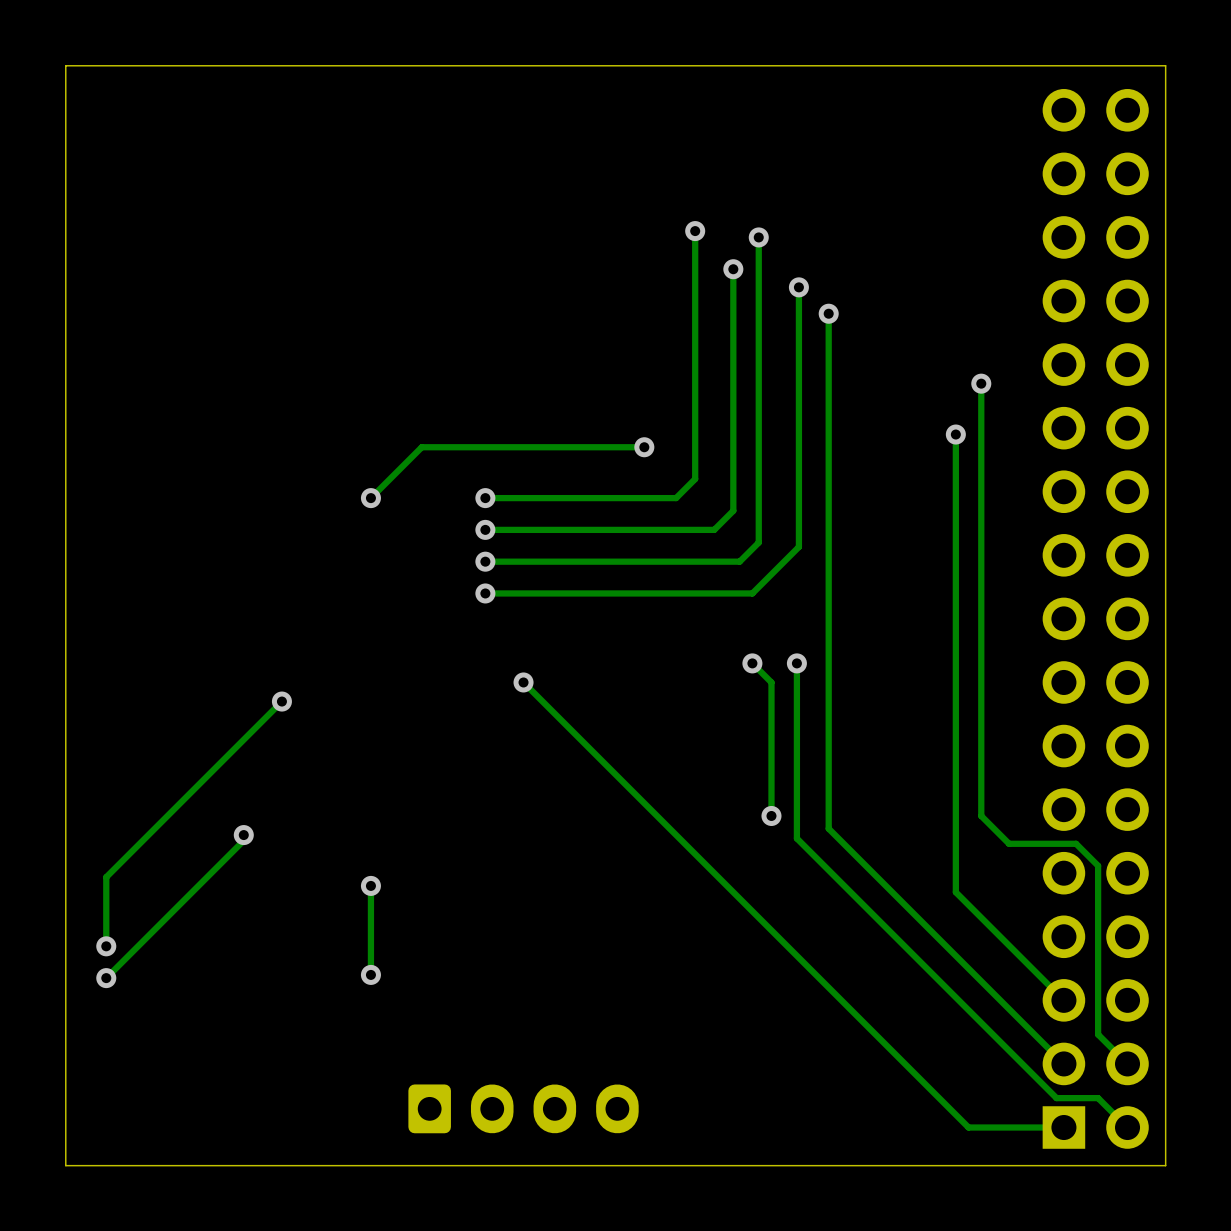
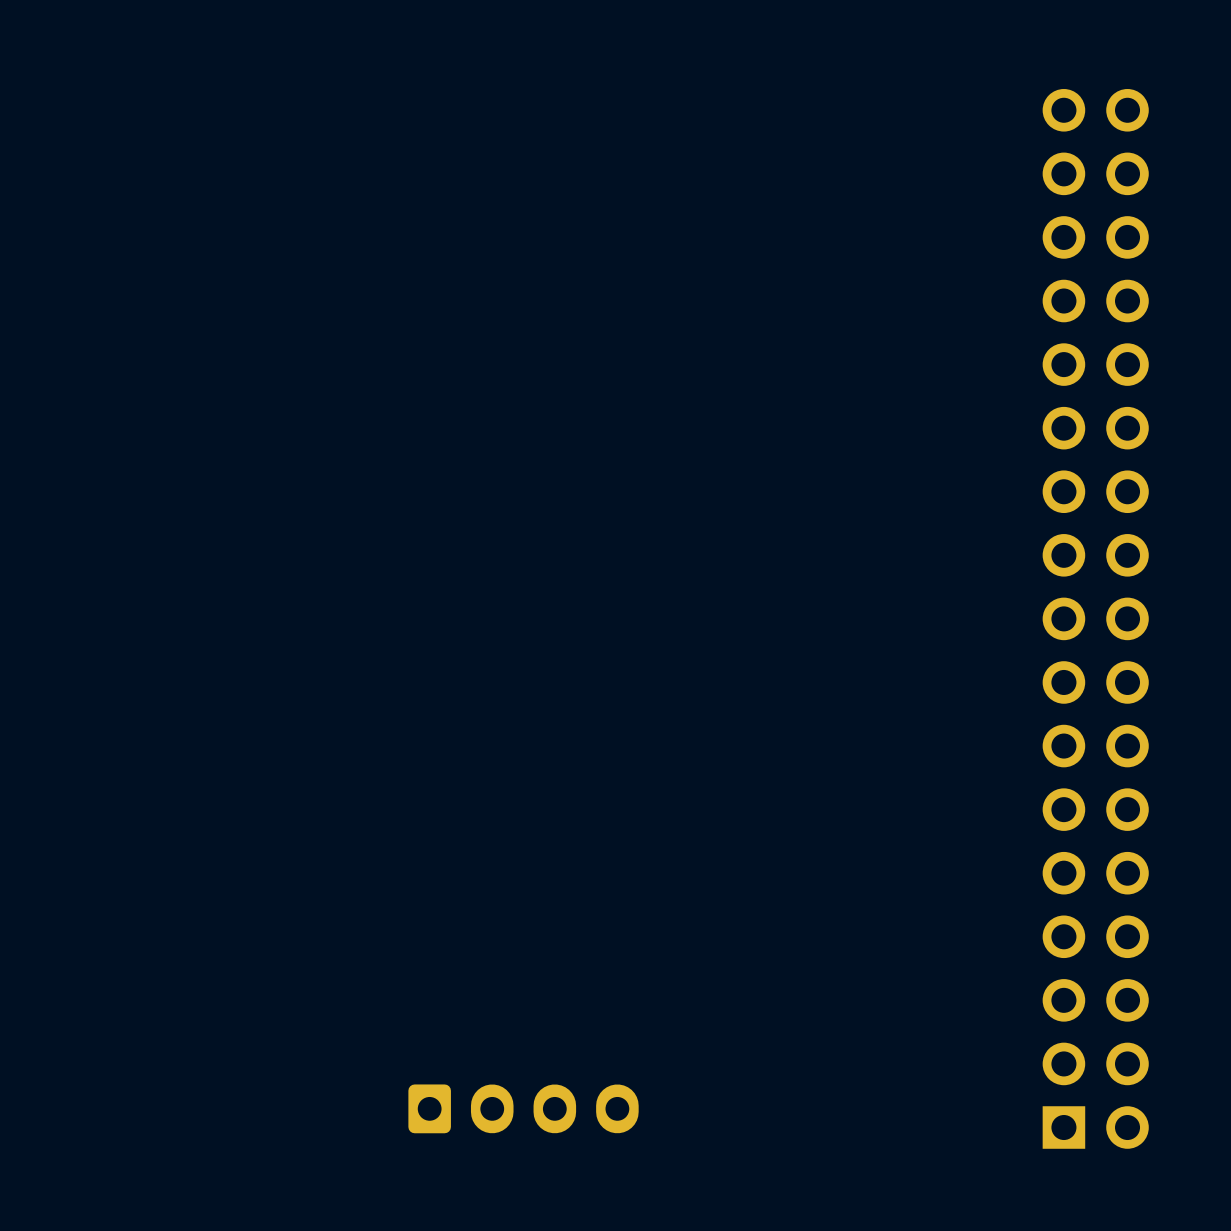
board edge: (1165, 65) (65, 65) (65, 1165) (1165, 1165) (1165, 65) -> none
track: (695, 231) (695, 479) (676, 498) (485, 498) -> none
via: (695, 231) -> none
track: (758, 237) (758, 542) (739, 561) (485, 561) -> none
via: (758, 237) -> none
track: (733, 269) (733, 510) (714, 529) (485, 529) -> none
via: (733, 269) -> none
track: (798, 287) (798, 546) (752, 593) (485, 593) -> none
via: (798, 287) -> none
track: (828, 313) (828, 828) (1063, 1063) -> none
via: (828, 313) -> none
track: (981, 383) (981, 815) (1009, 843) (1076, 843) (1098, 865) (1098, 1034) (1127, 1063) -> none
via: (981, 383) -> none
track: (955, 434) (955, 892) (1063, 1000) -> none
via: (955, 434) -> none
track: (644, 447) (421, 447) (370, 498) -> none
via: (644, 447) -> none
via: (370, 498) -> none
via: (485, 498) -> none
via: (485, 529) -> none
via: (485, 561) -> none
via: (485, 593) -> none
track: (752, 663) (771, 682) (771, 815) -> none
via: (752, 663) -> none
track: (796, 663) (796, 838) (1056, 1098) (1098, 1098) (1127, 1127) -> none
via: (796, 663) -> none
track: (523, 682) (968, 1127) (1063, 1127) -> none
via: (523, 682) -> none
track: (281, 701) (106, 877) (106, 946) -> none
via: (281, 701) -> none
via: (771, 815) -> none
track: (243, 835) (243, 840) (106, 978) -> none
via: (243, 835) -> none
track: (370, 885) (370, 974) -> none
via: (370, 885) -> none
via: (106, 946) -> none
via: (370, 974) -> none
via: (106, 978) -> none

